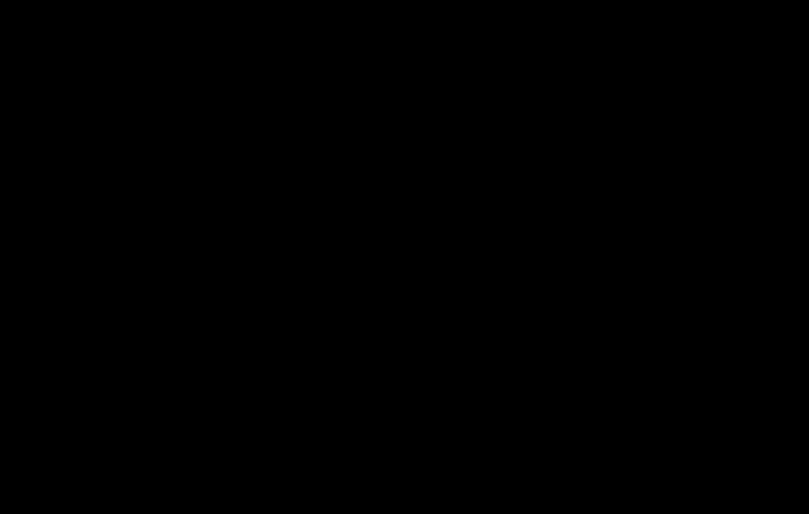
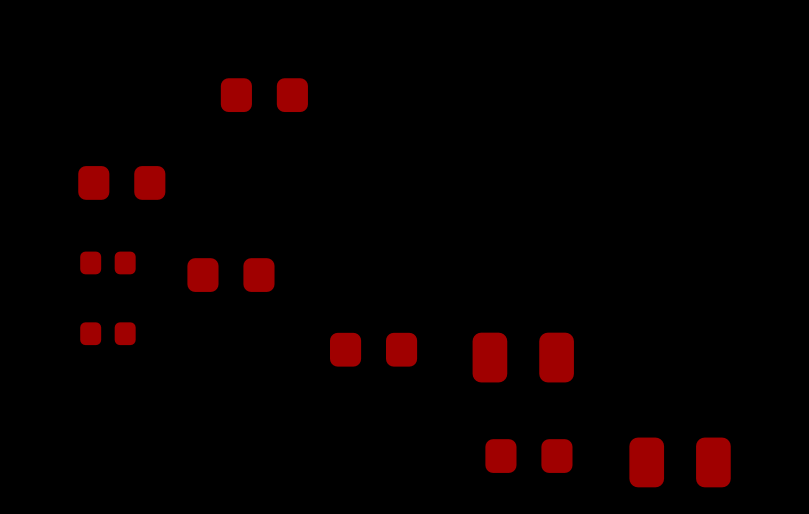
part: none -> (264, 95)
part: none -> (121, 182)
part: none -> (107, 262)
part: none -> (230, 275)
part: none -> (107, 333)
part: none -> (373, 349)
part: none -> (523, 357)
part: none -> (528, 456)
part: none -> (680, 462)

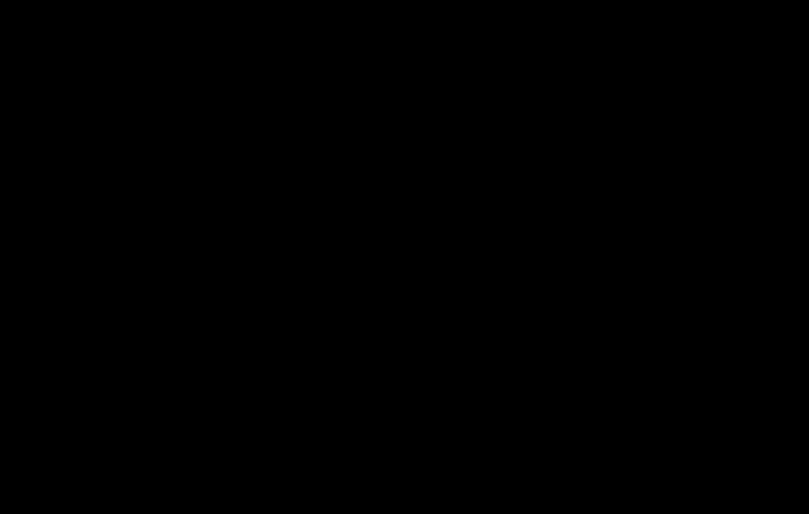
part: (264, 95) -> none
part: (121, 182) -> none
part: (107, 262) -> none
part: (230, 275) -> none
part: (107, 333) -> none
part: (373, 349) -> none
part: (523, 357) -> none
part: (528, 456) -> none
part: (680, 462) -> none

